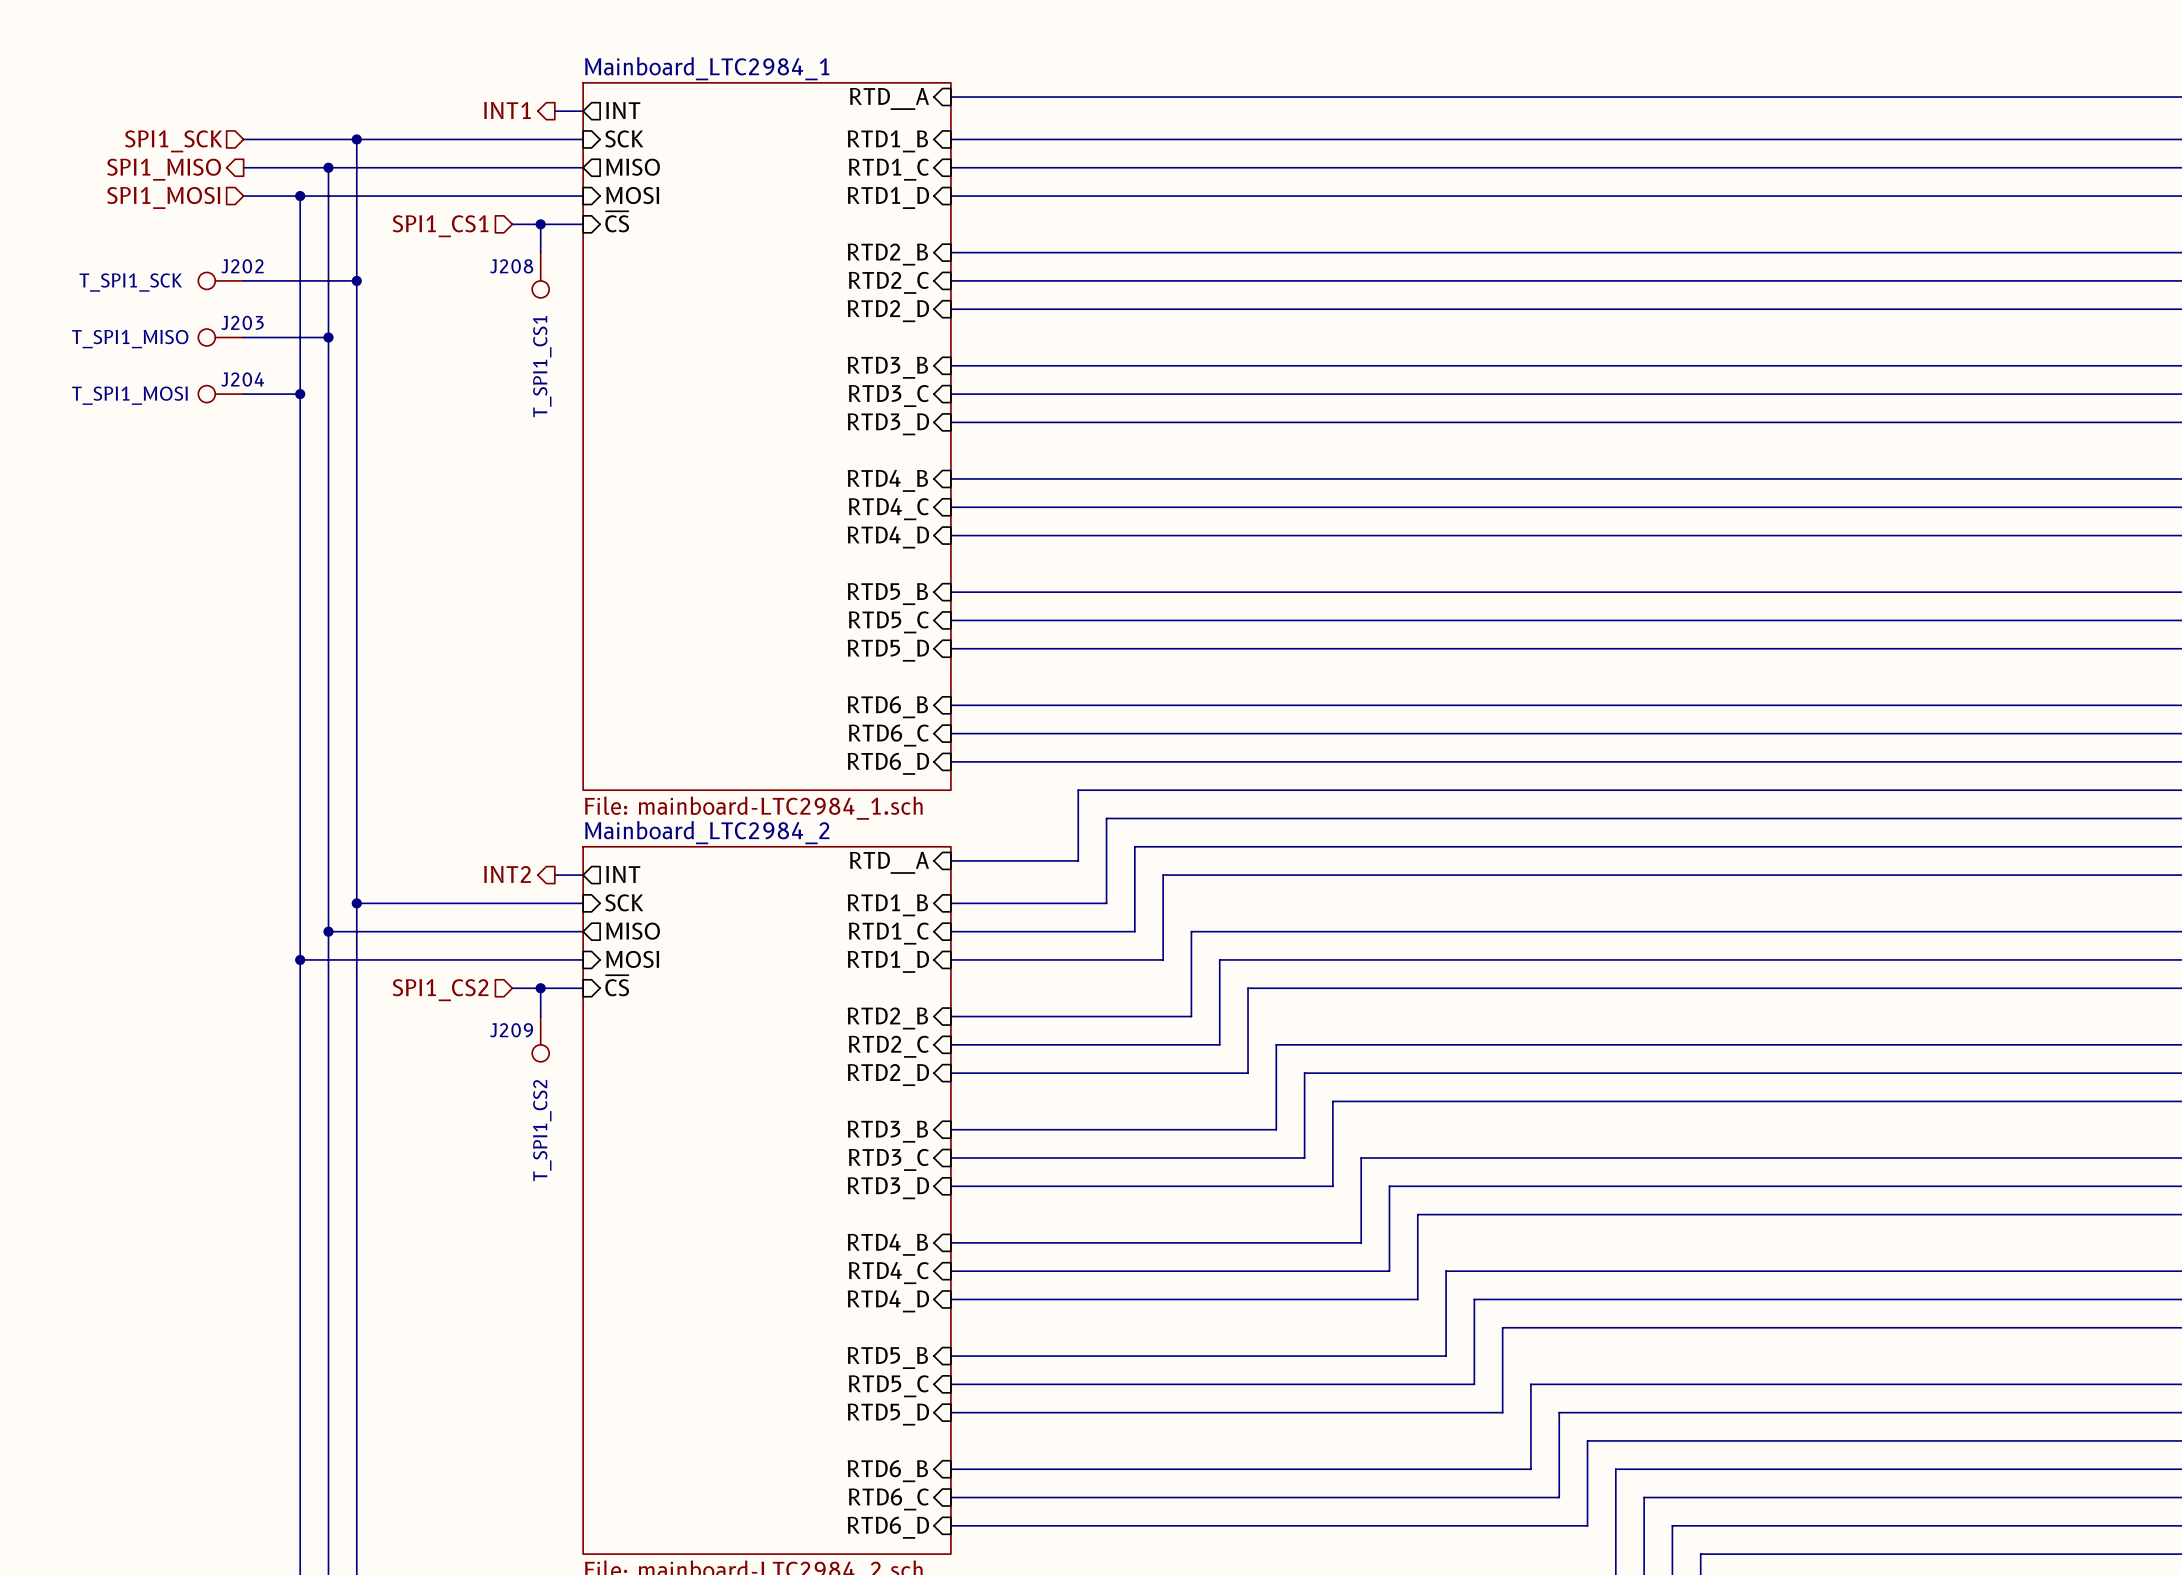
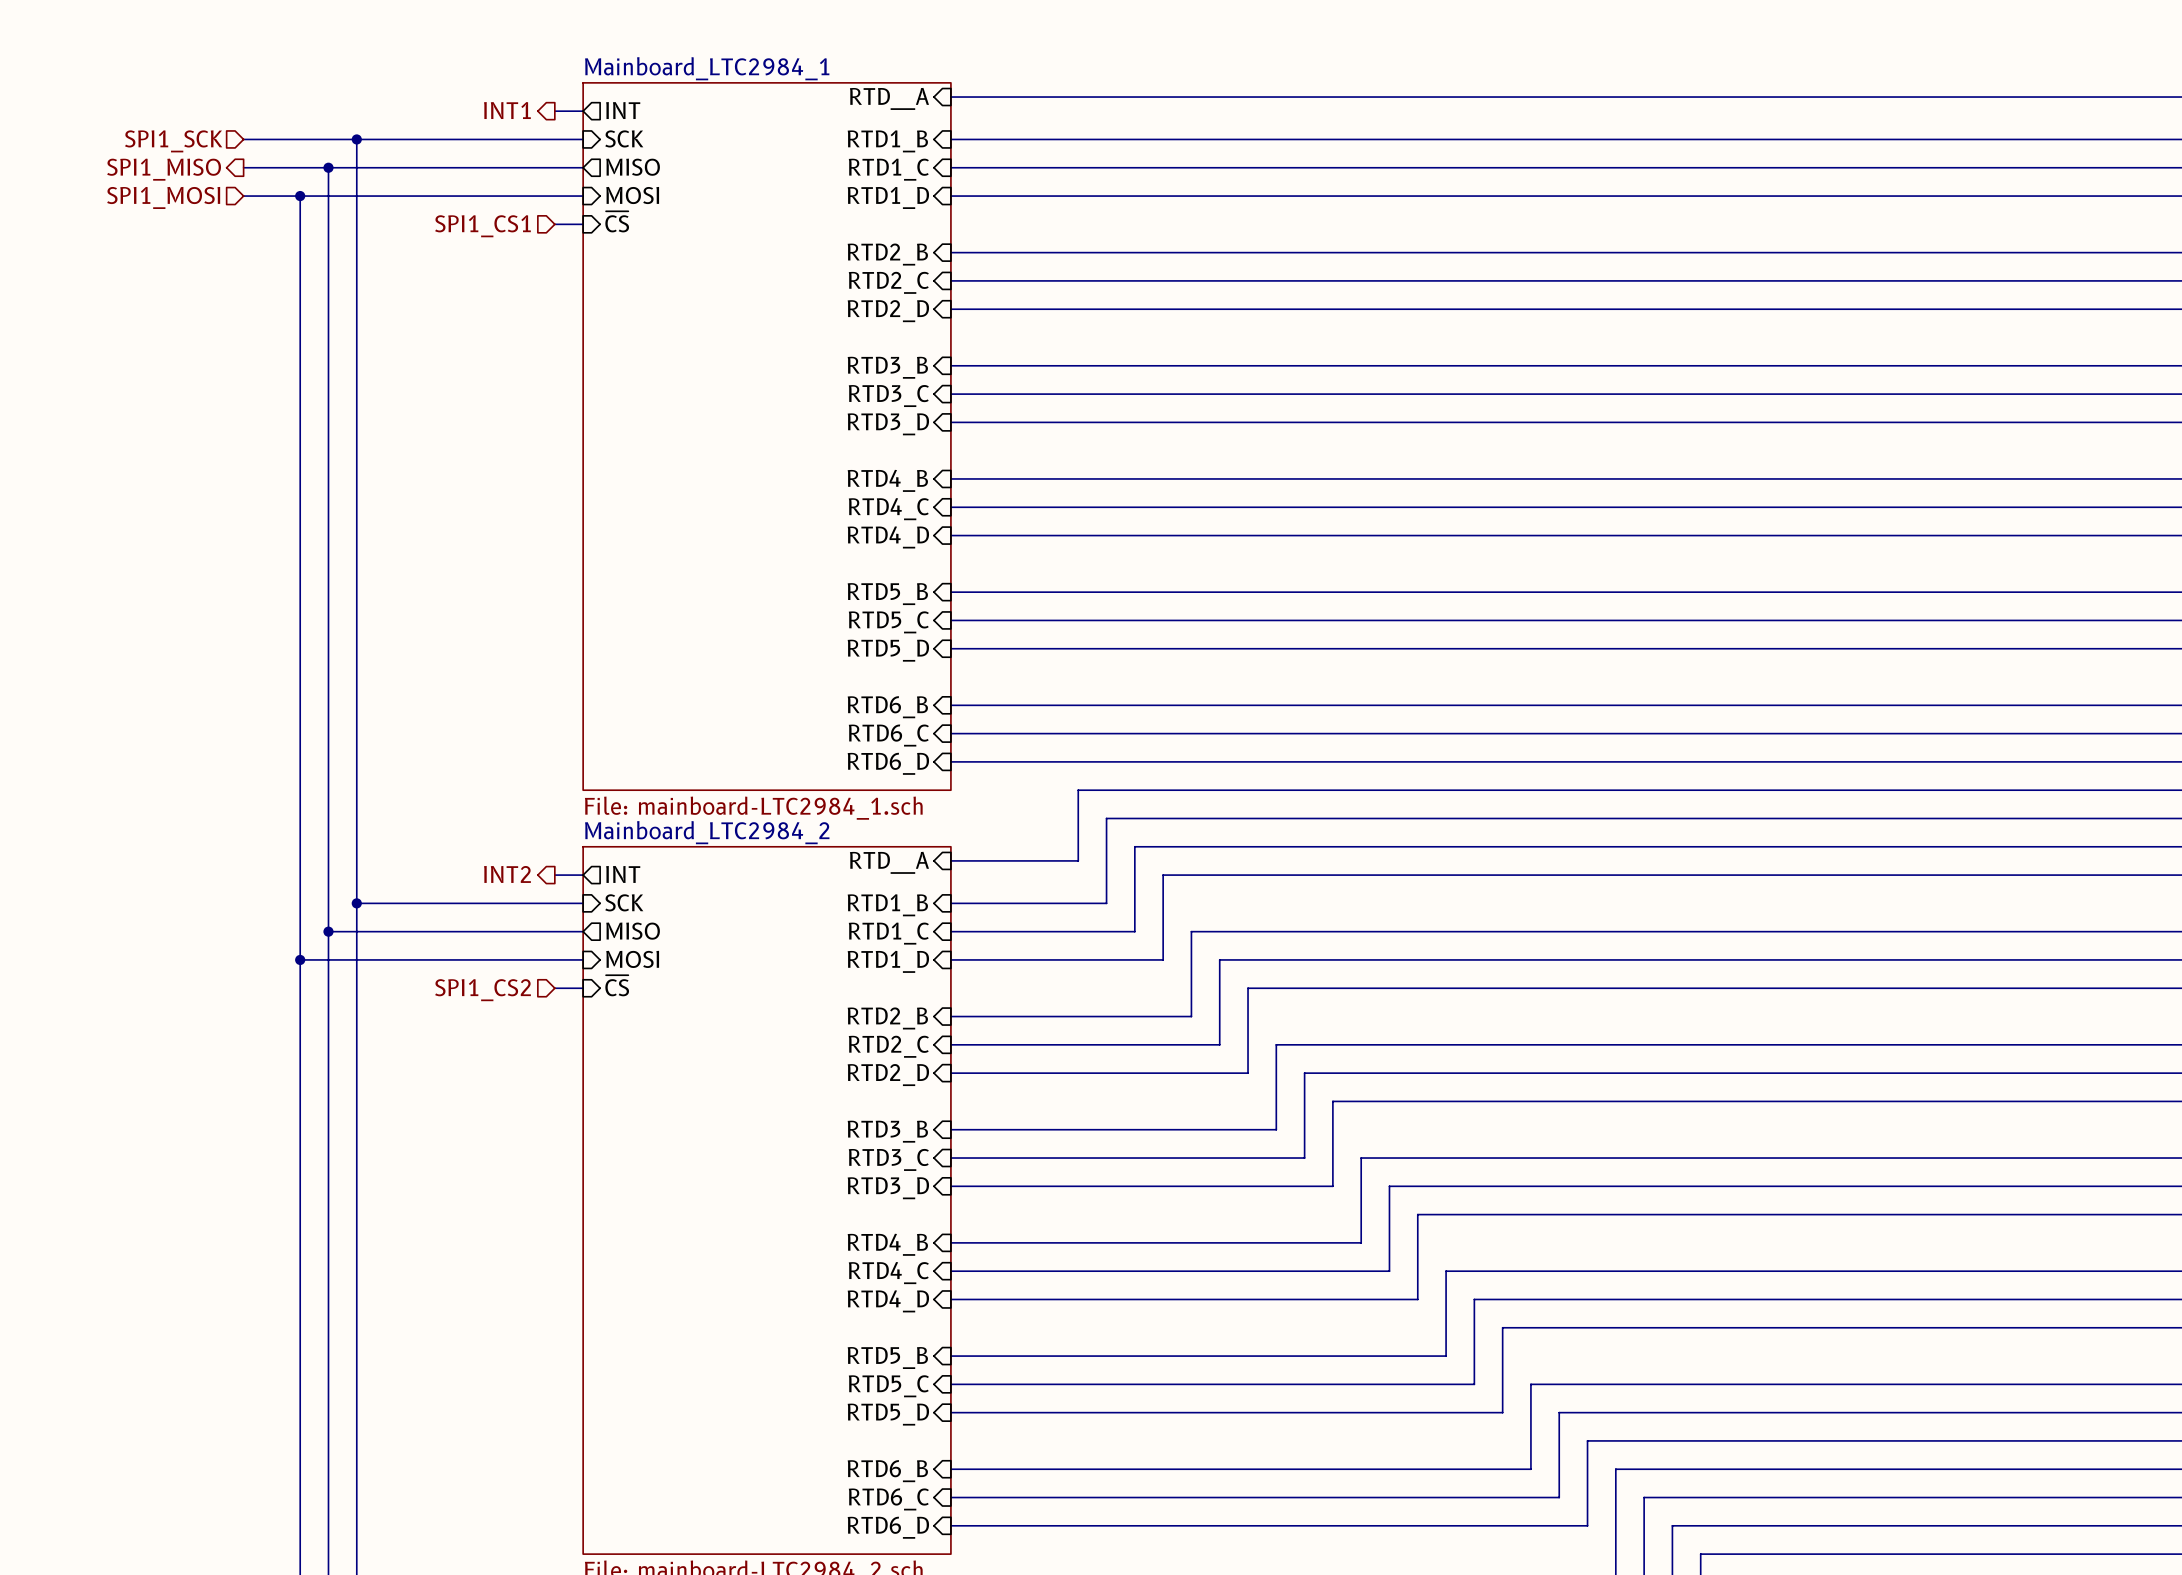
wire: (512, 224) (554, 224) -> none
wire: (540, 224) (540, 252) -> none
junction: (540, 224) -> none
hierarchical label position: SPI1_CS1 (440, 226) -> SPI1_CS1 (482, 226)
J208: T_SPI1_CS1 (540, 275) -> none
J202: T_SPI1_SCK (220, 280) -> none
wire: (243, 280) (356, 280) -> none
junction: (356, 280) -> none
J203: T_SPI1_MISO (220, 337) -> none
wire: (243, 337) (328, 337) -> none
junction: (328, 337) -> none
J204: T_SPI1_MOSI (220, 394) -> none
wire: (243, 394) (300, 394) -> none
junction: (300, 394) -> none
wire: (512, 988) (554, 988) -> none
wire: (540, 988) (540, 1016) -> none
junction: (540, 988) -> none
hierarchical label position: SPI1_CS2 (440, 990) -> SPI1_CS2 (483, 990)
J209: T_SPI1_CS2 (540, 1039) -> none

